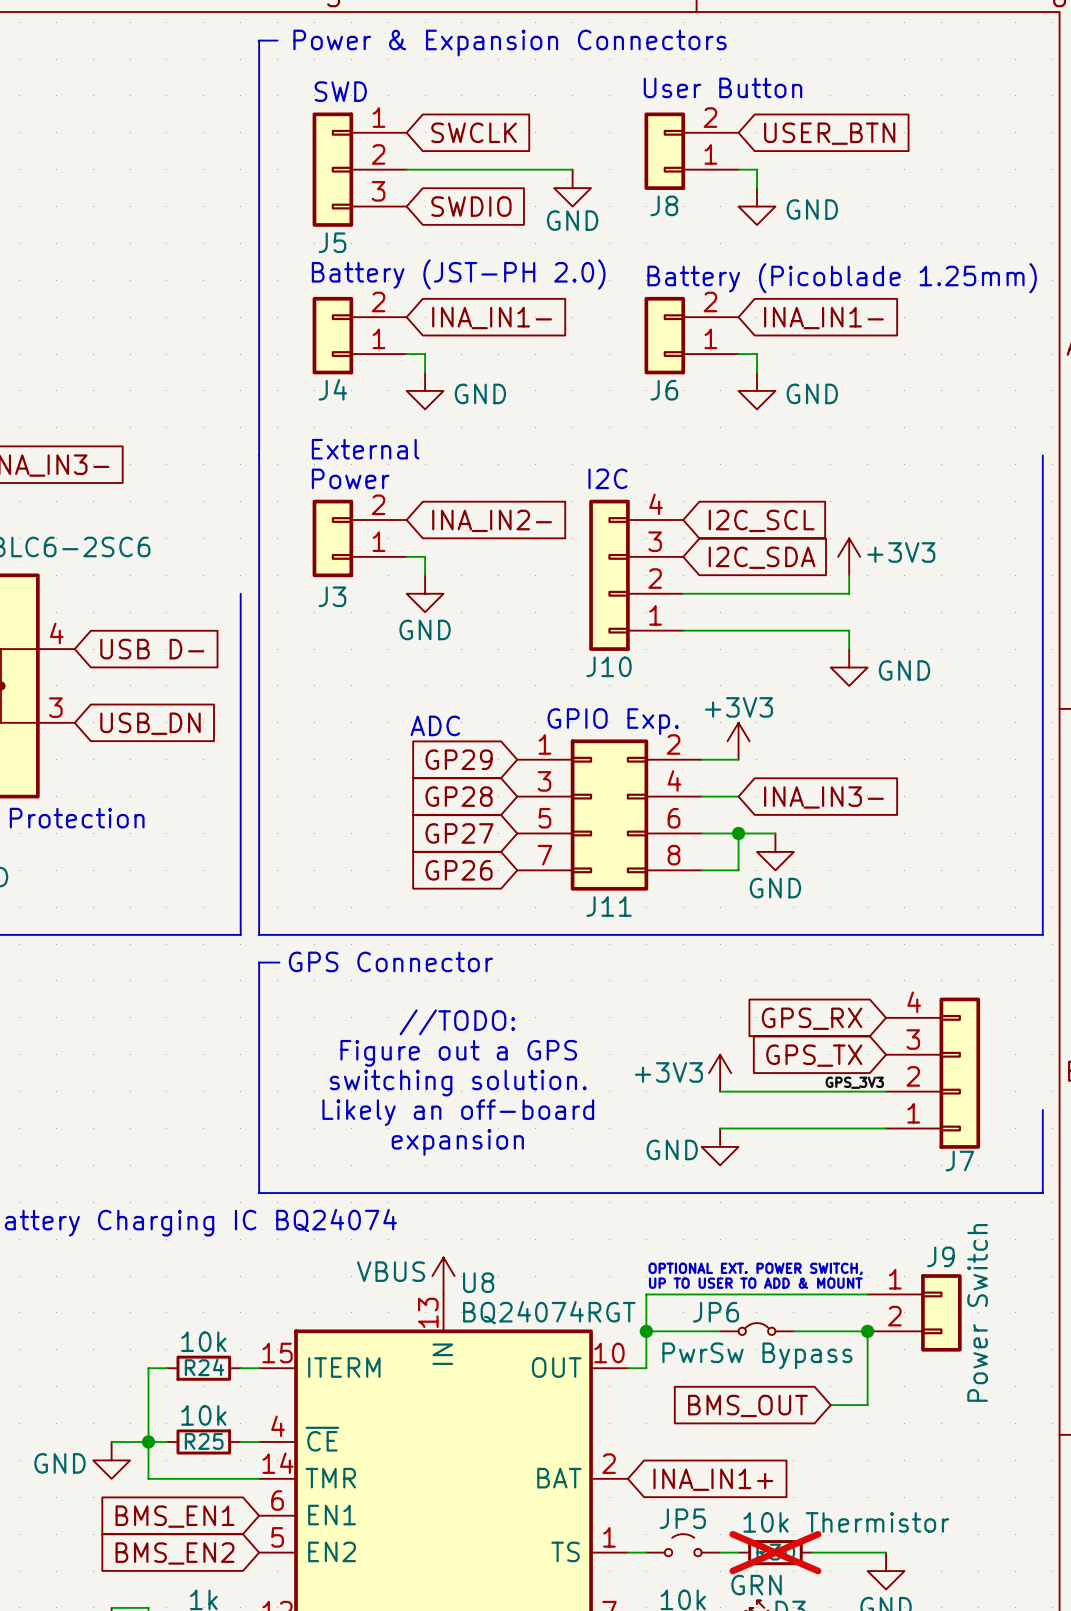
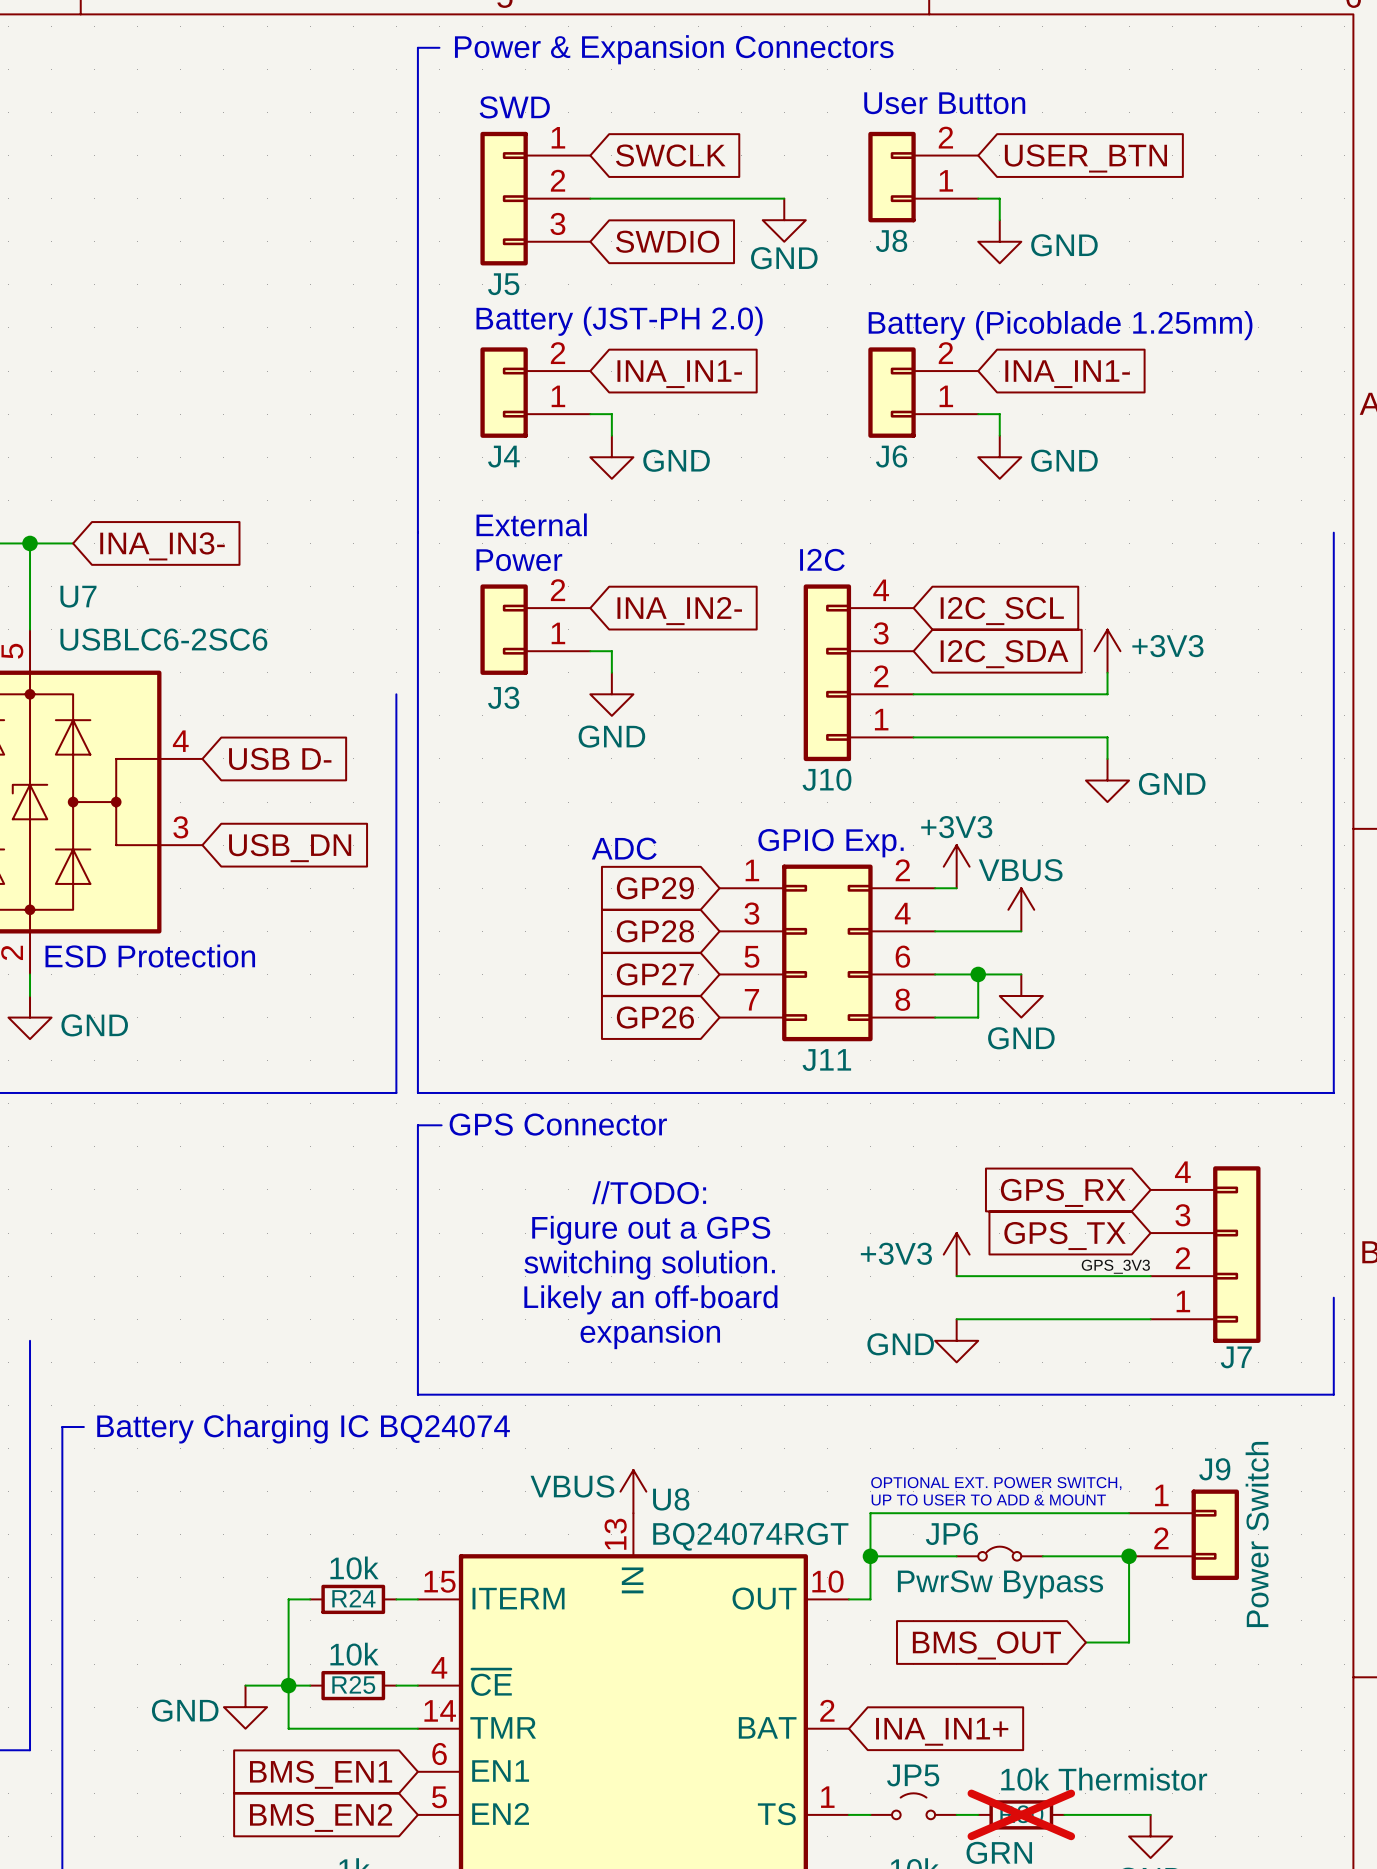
power symbol position: +3V3 (738, 741) -> +3V3 (956, 866)
wire: (720, 759) (738, 759) -> none
power symbol: none -> VBUS (1021, 909)
wire: none -> (978, 931) (1021, 931)
global label: INA_IN3- (823, 797) -> none

